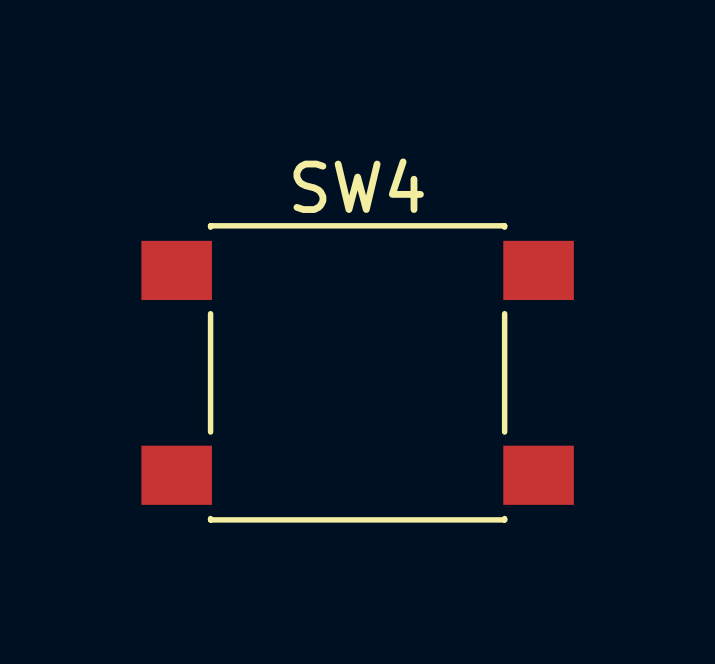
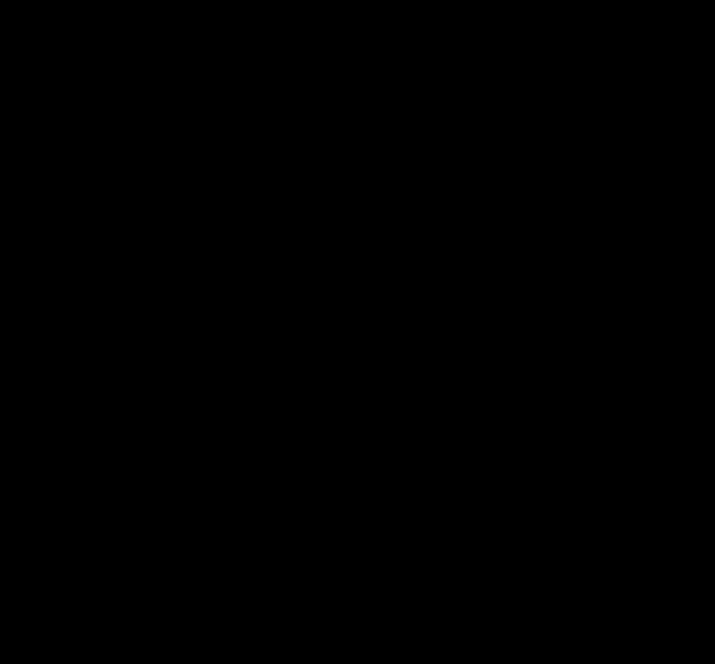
SW4: (357, 372) -> none

